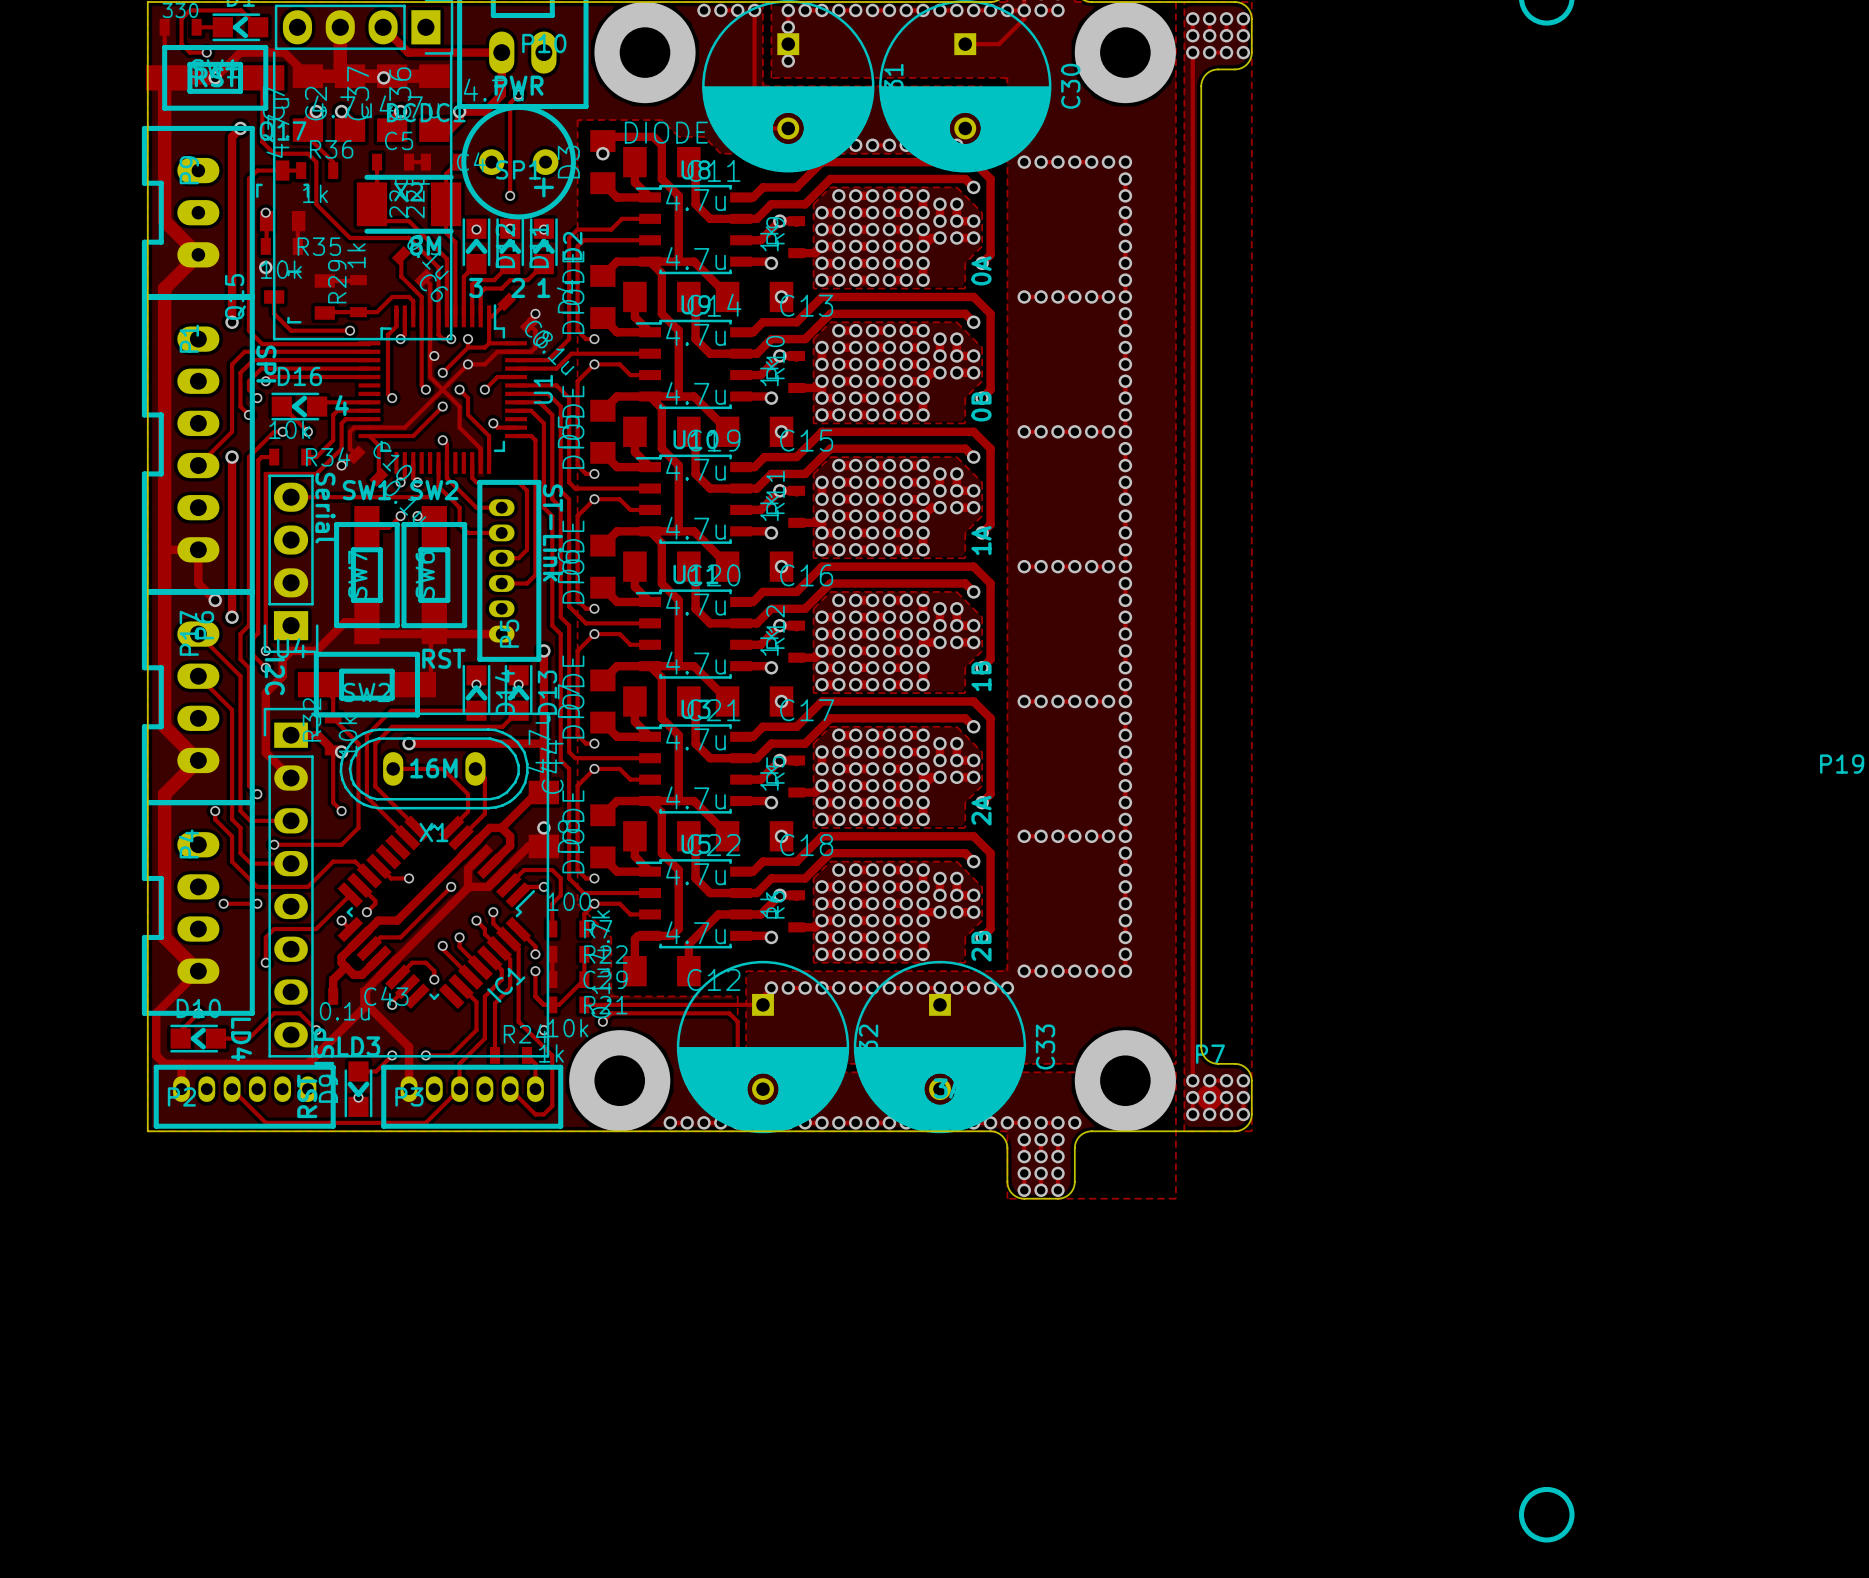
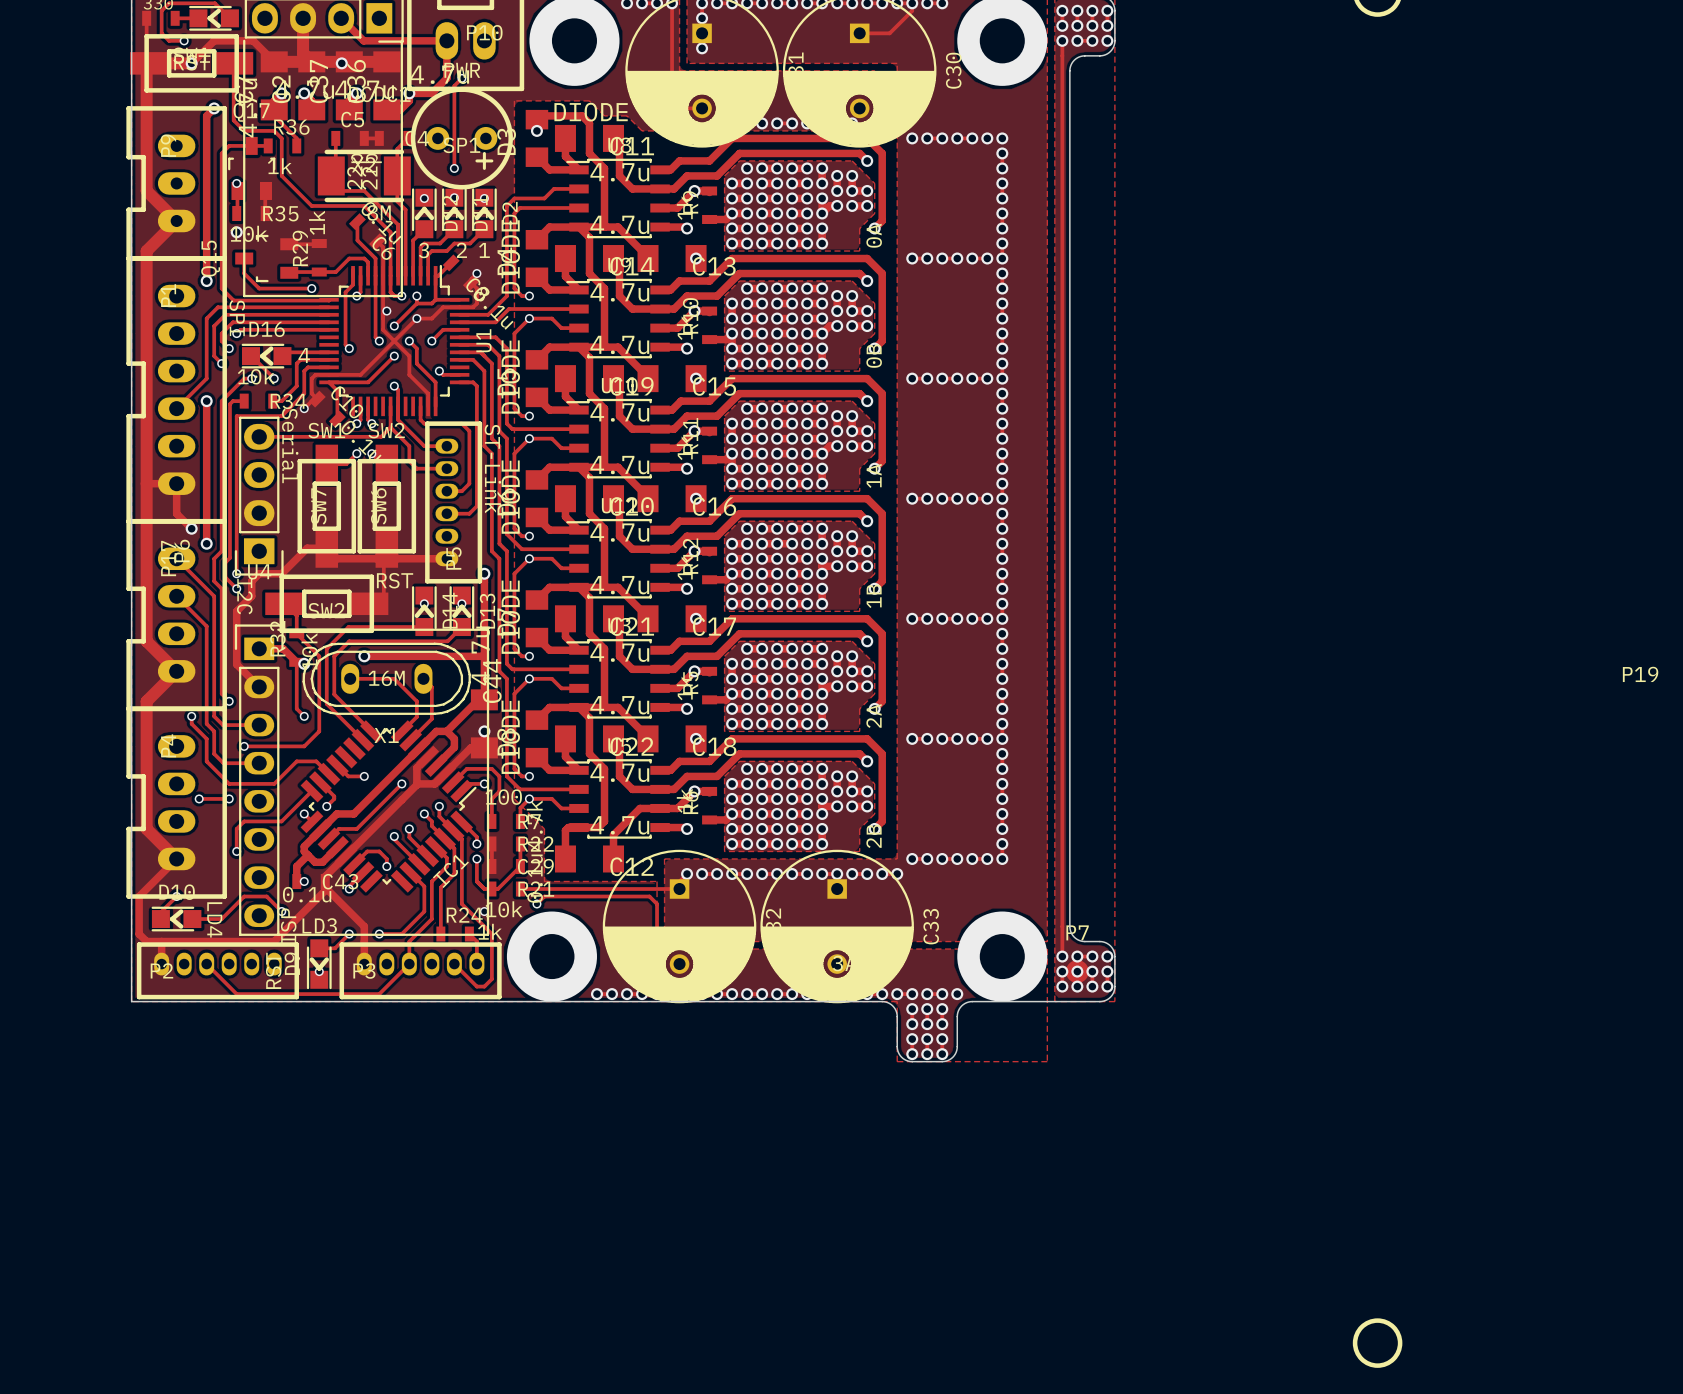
via: none -> (304, 881)

